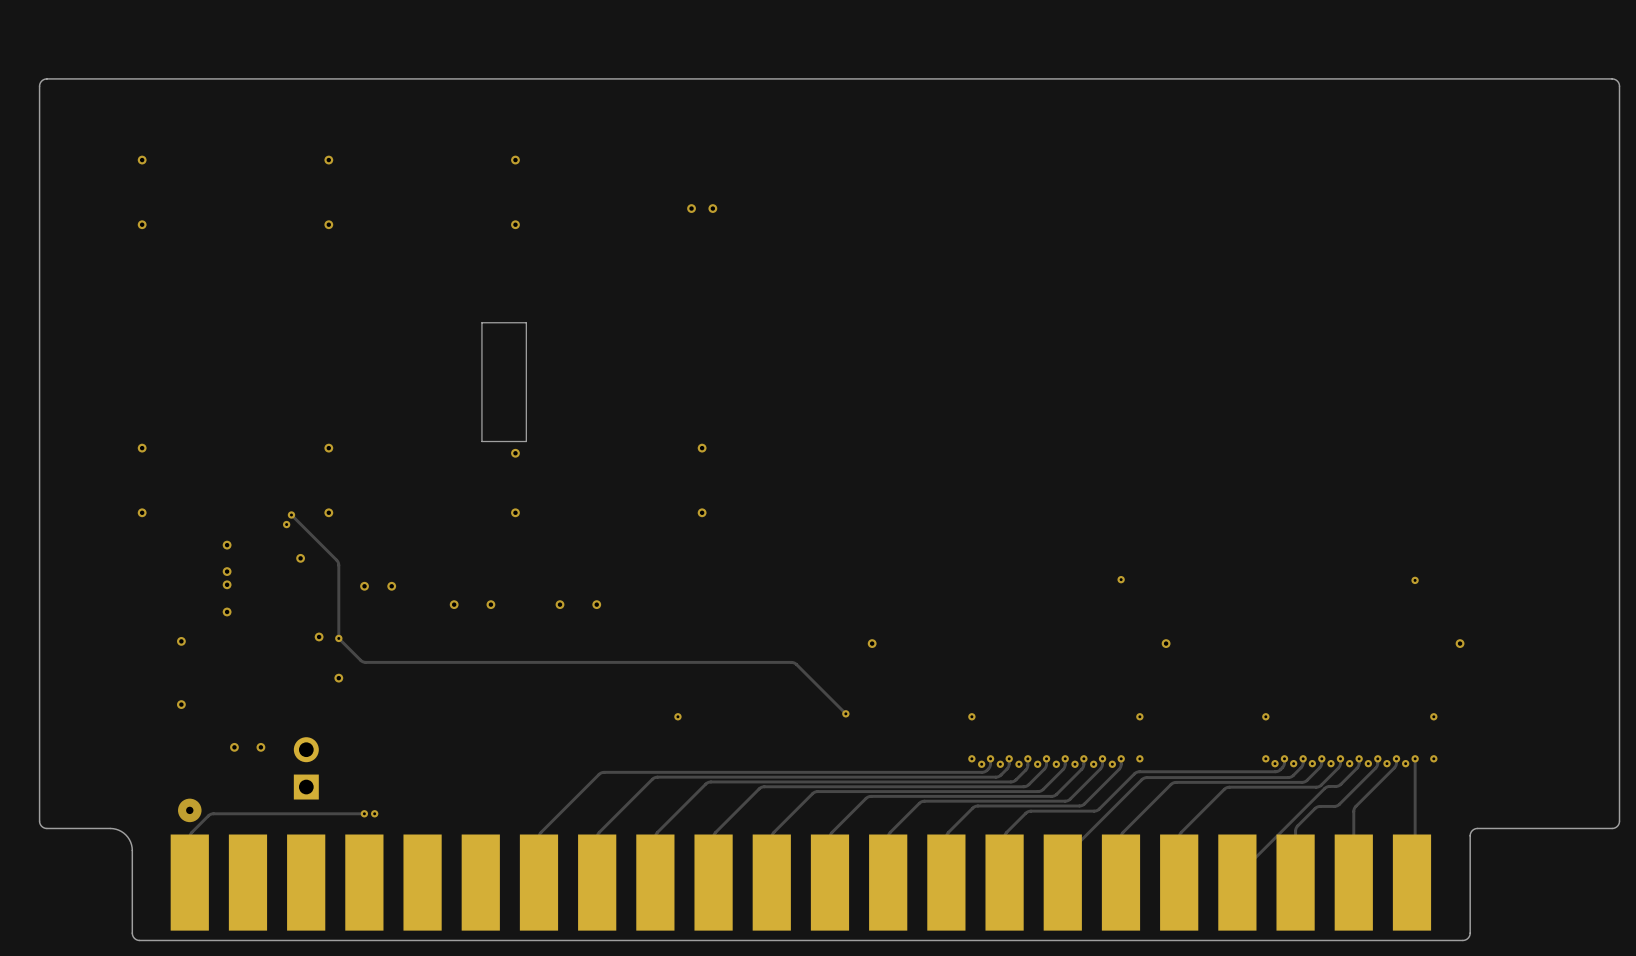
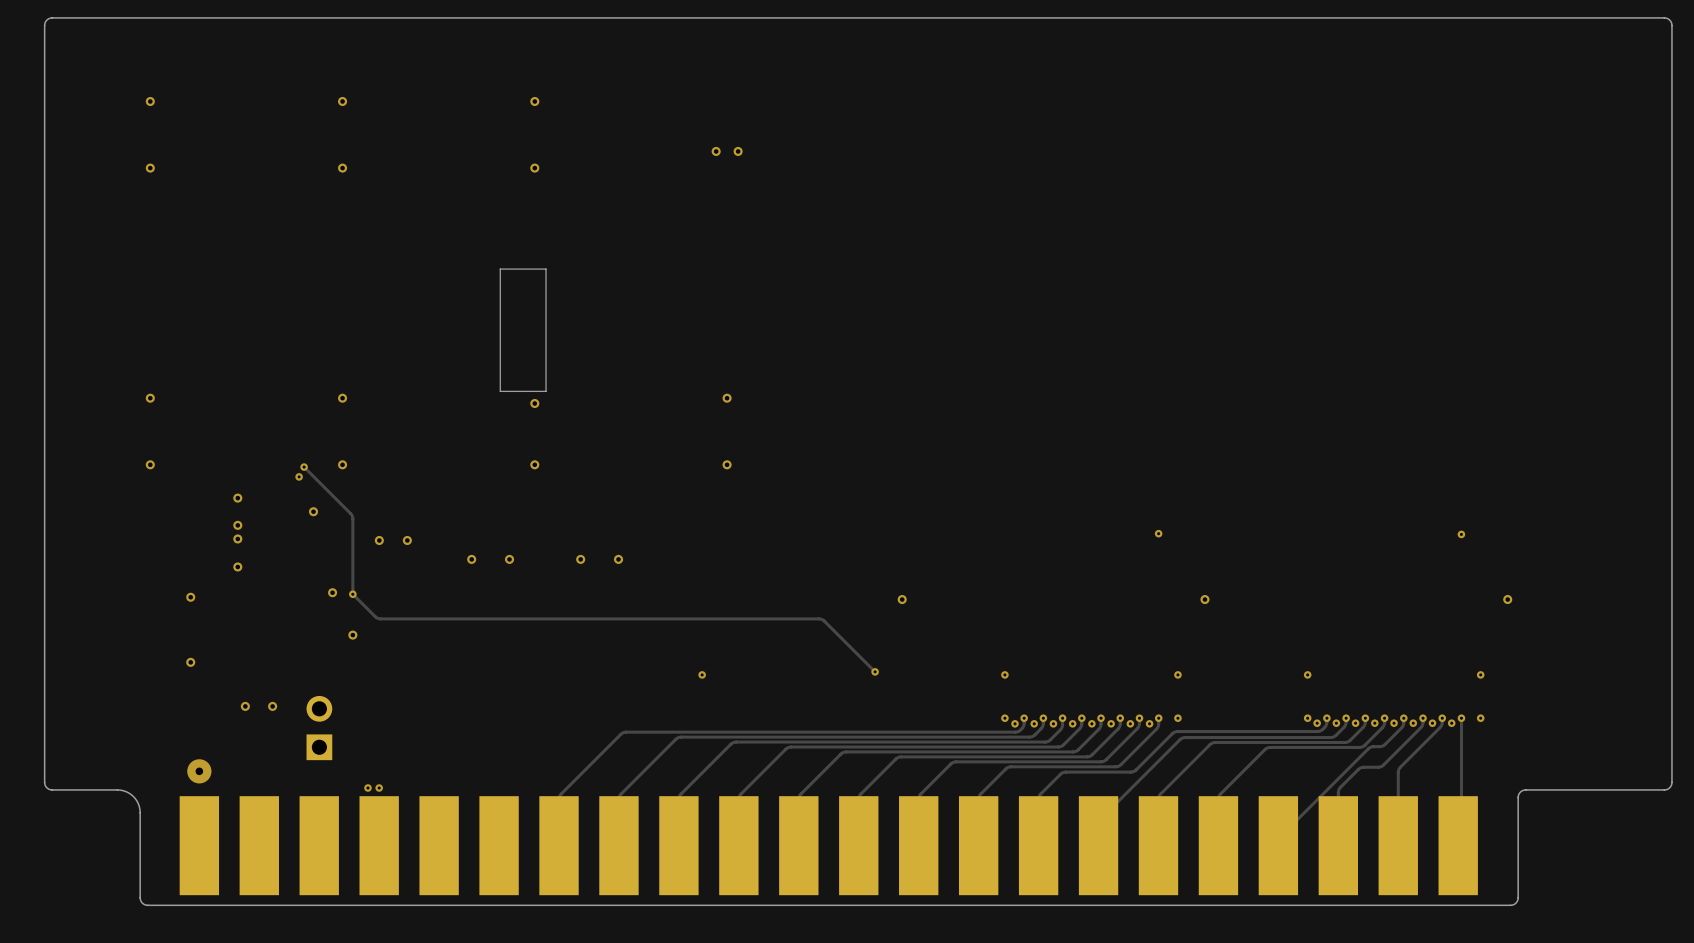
track: (364, 813) (210, 814) (190, 835) (189, 882) -> none
via: (364, 813) -> none
via: (374, 813) -> none
via: none -> (367, 787)
via: none -> (379, 787)

